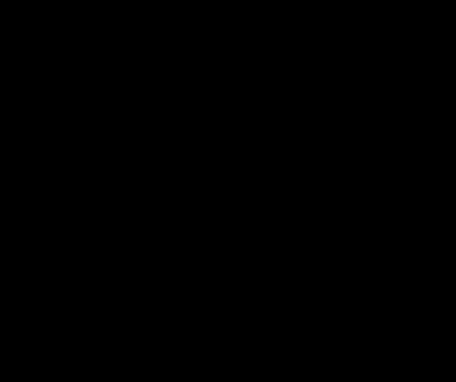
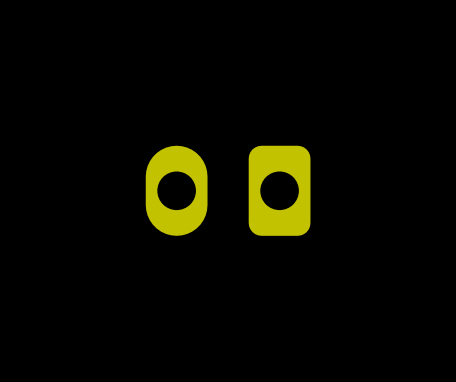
part: none -> (228, 190)

